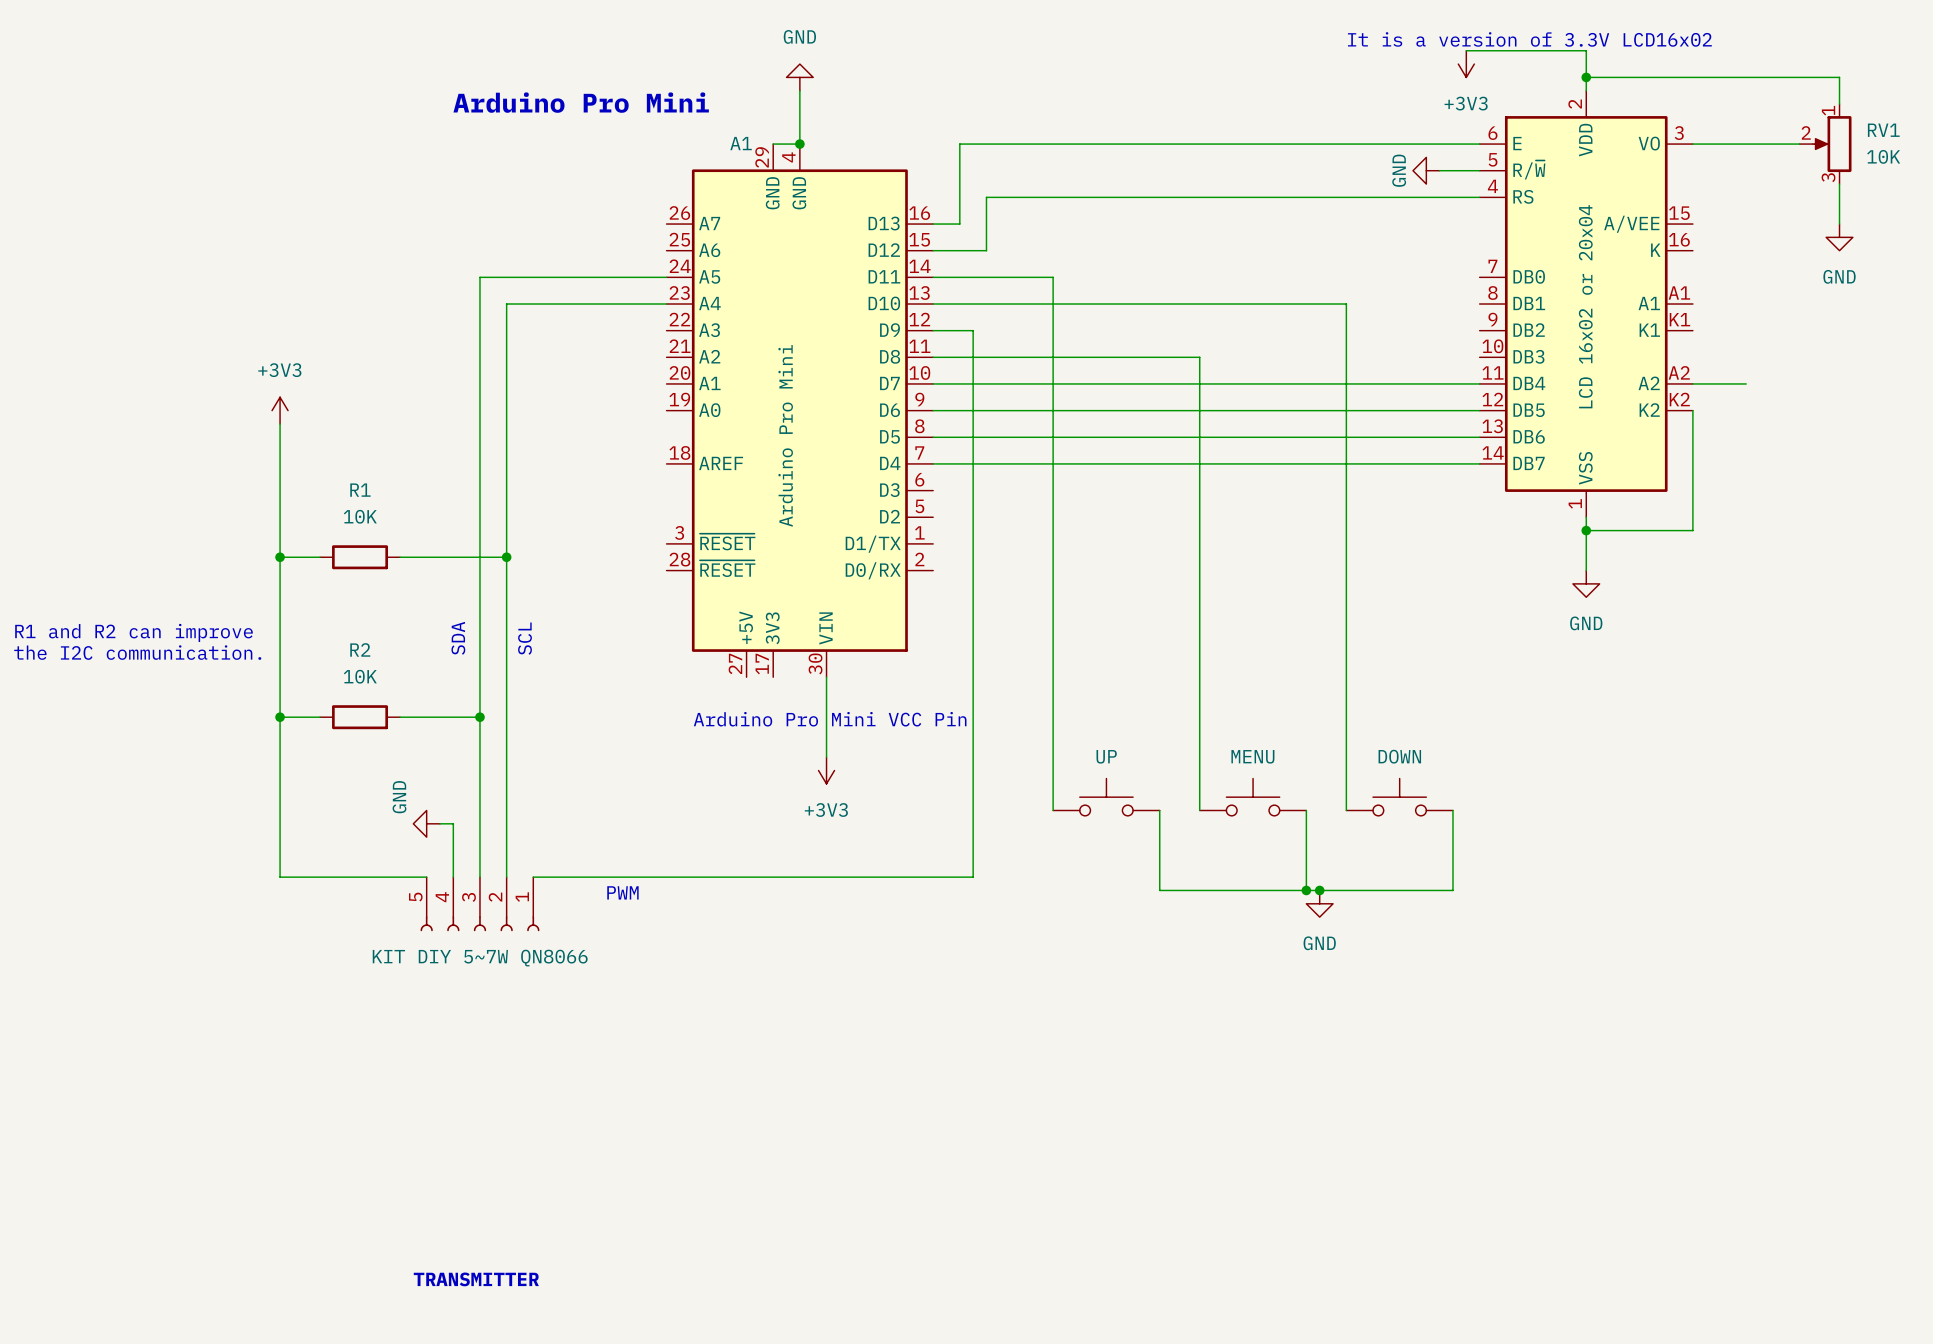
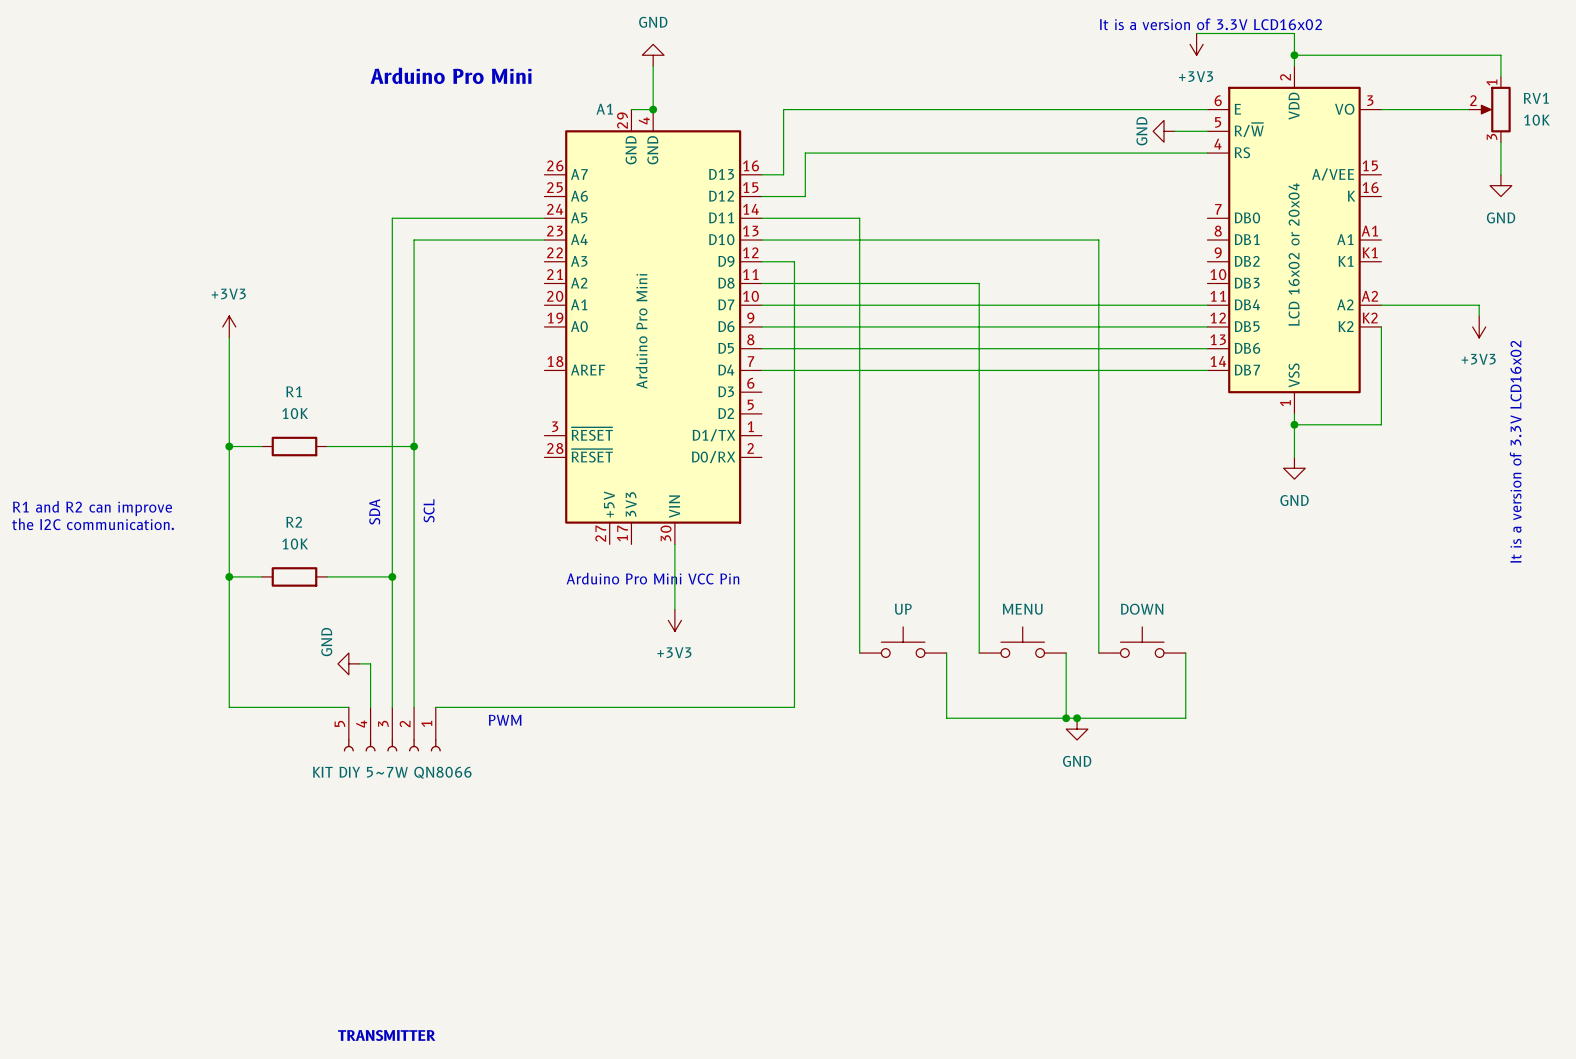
wire: none -> (1424, 305) (1479, 305) (1479, 316)
power symbol: none -> +3V3 (1479, 326)
text: none -> It is a version of 3.3V LCD16x02 (1515, 451)

